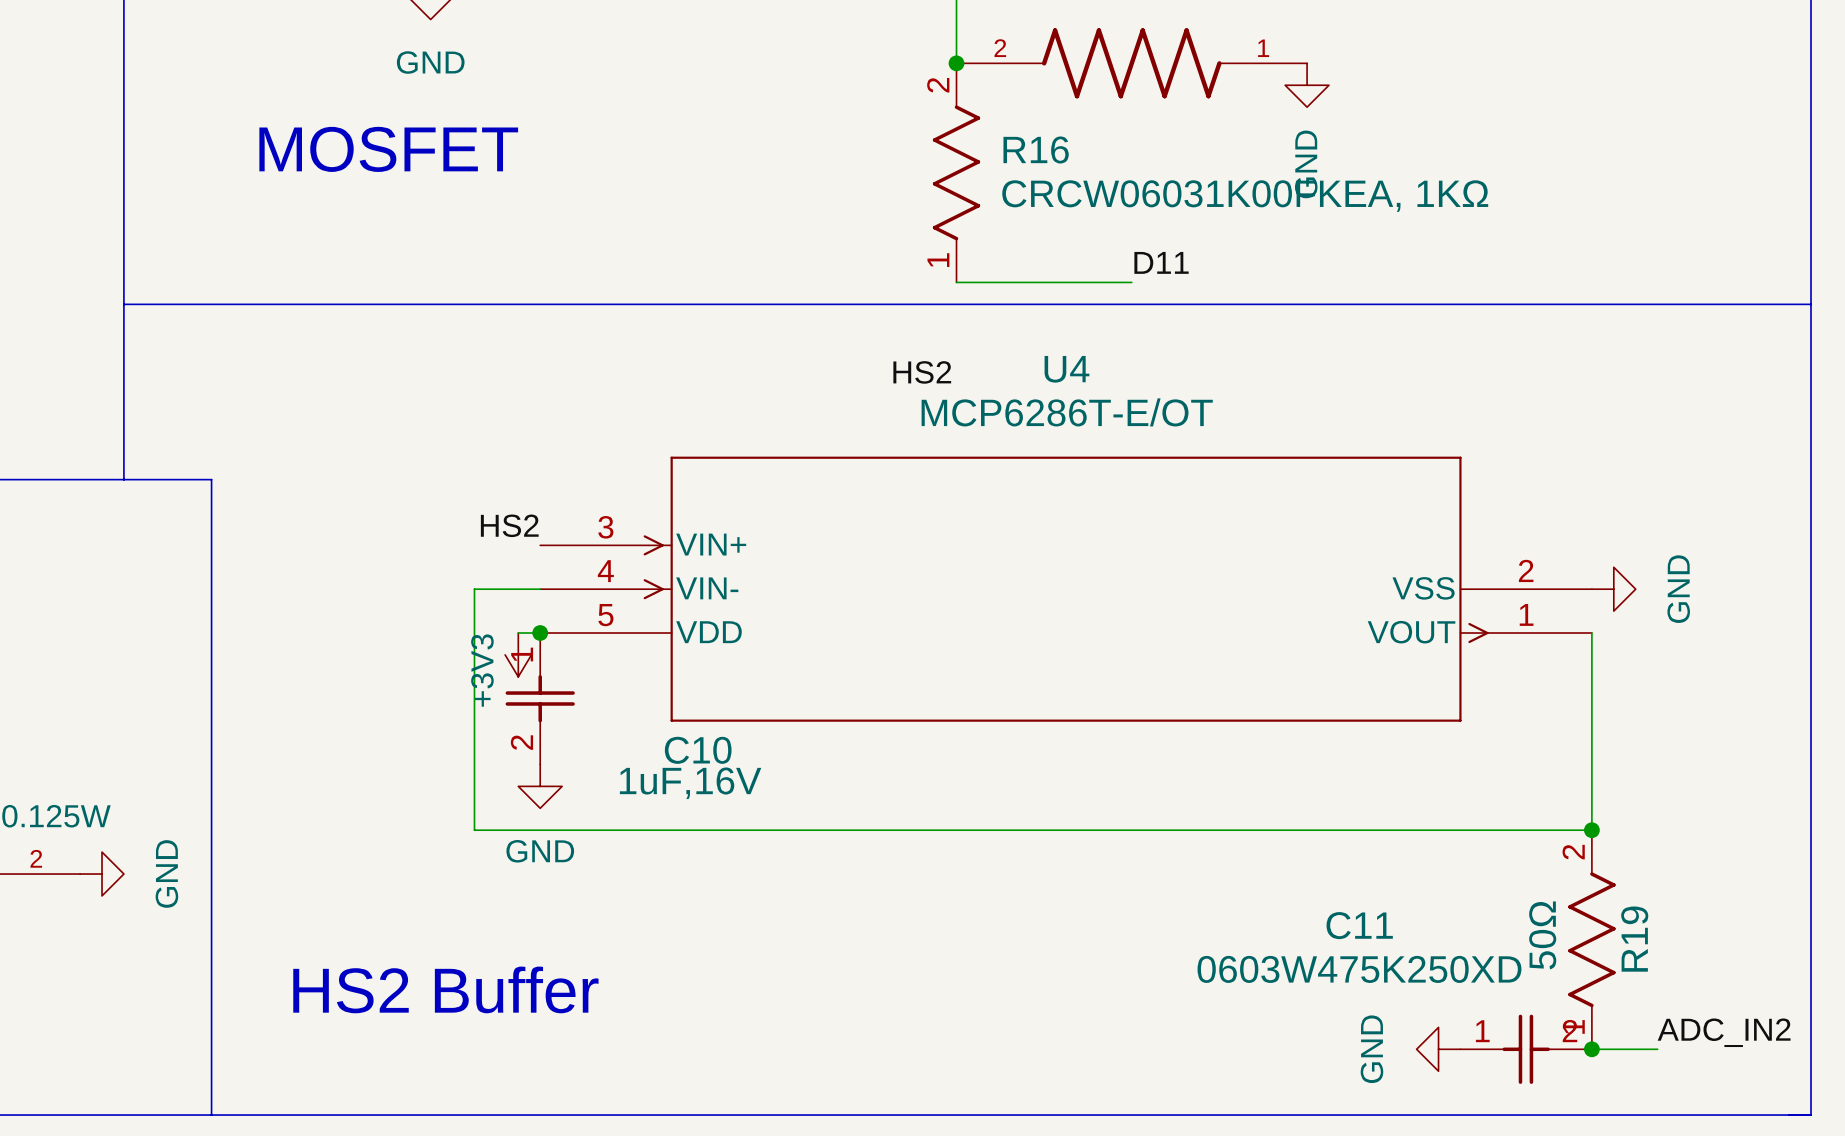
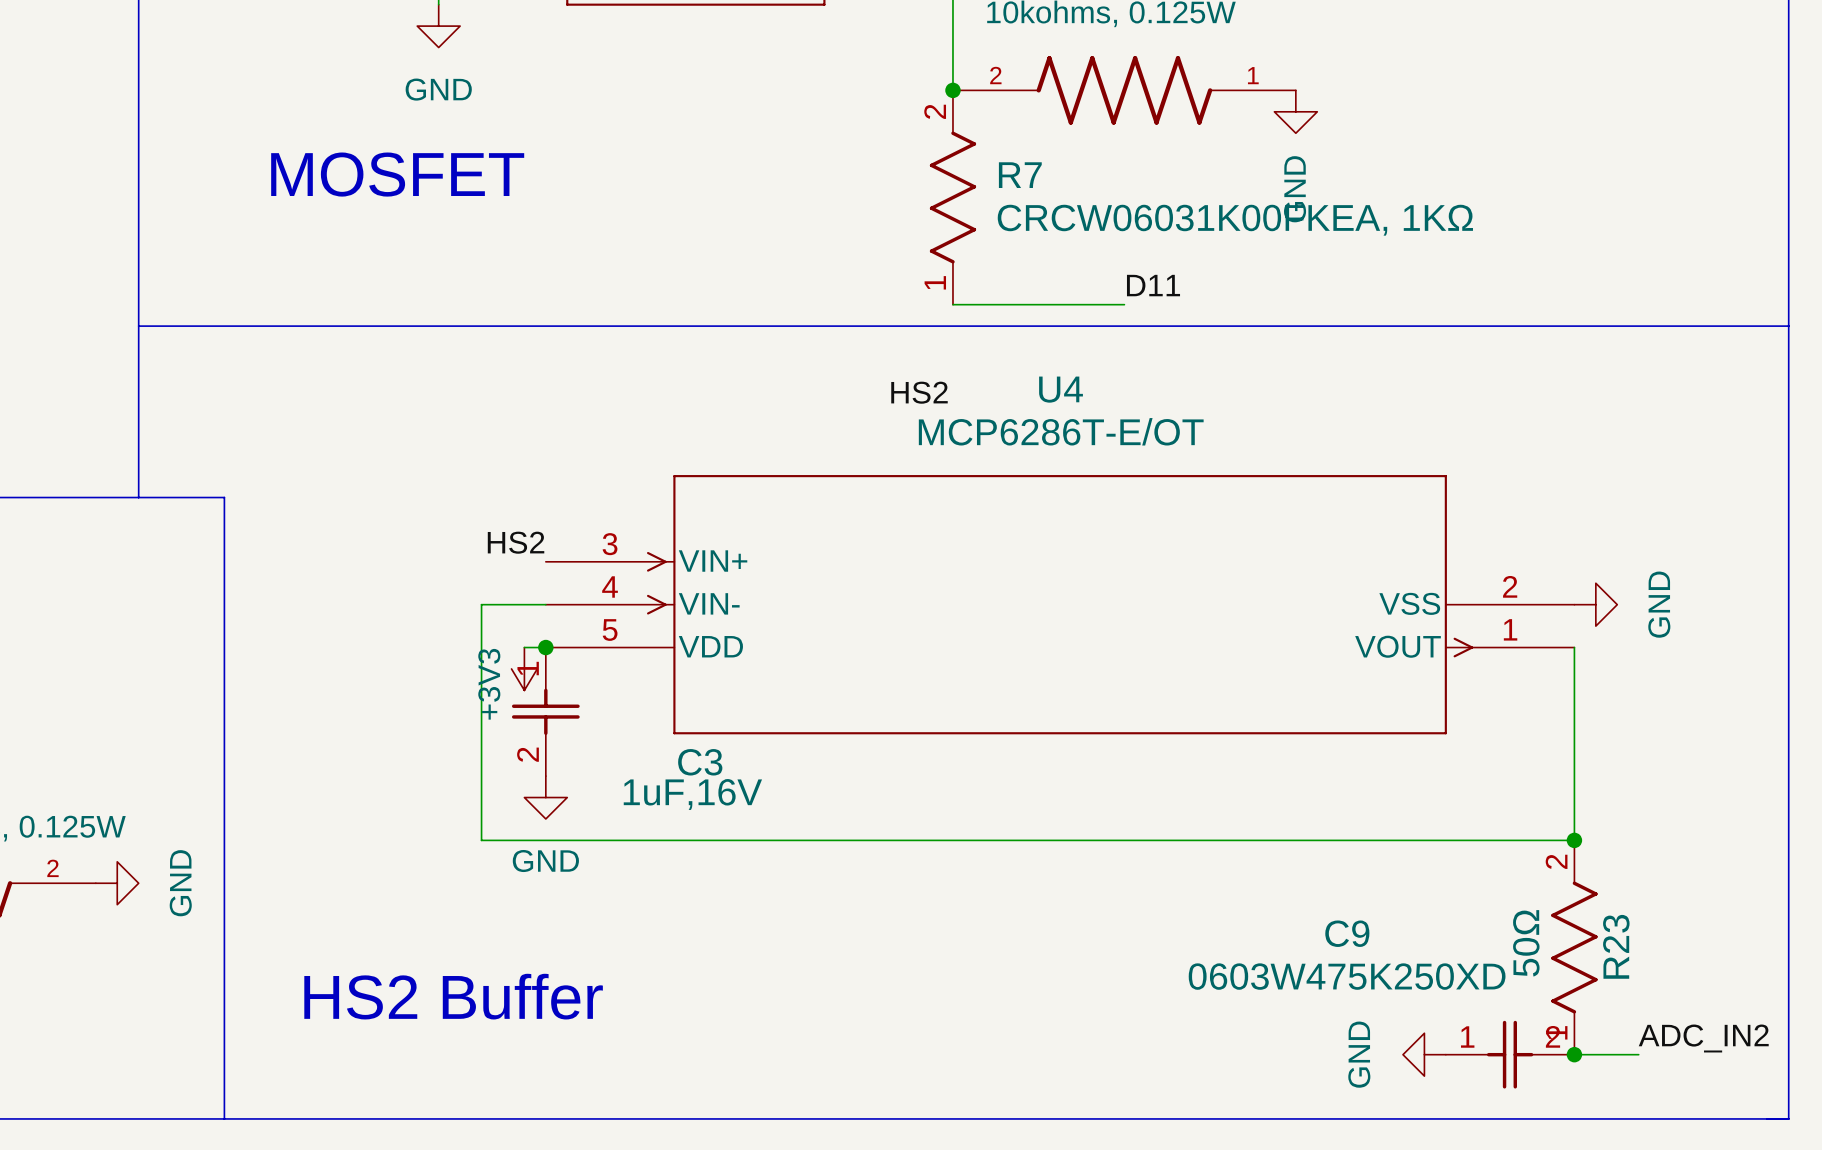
R16 name: R16 (1036, 149) -> R7 (1020, 175)
C10 name: C10 (698, 750) -> C3 (700, 762)
C11 name: C11 (1359, 925) -> C9 (1347, 933)
R19 name: R19 (1634, 939) -> R23 (1616, 946)

